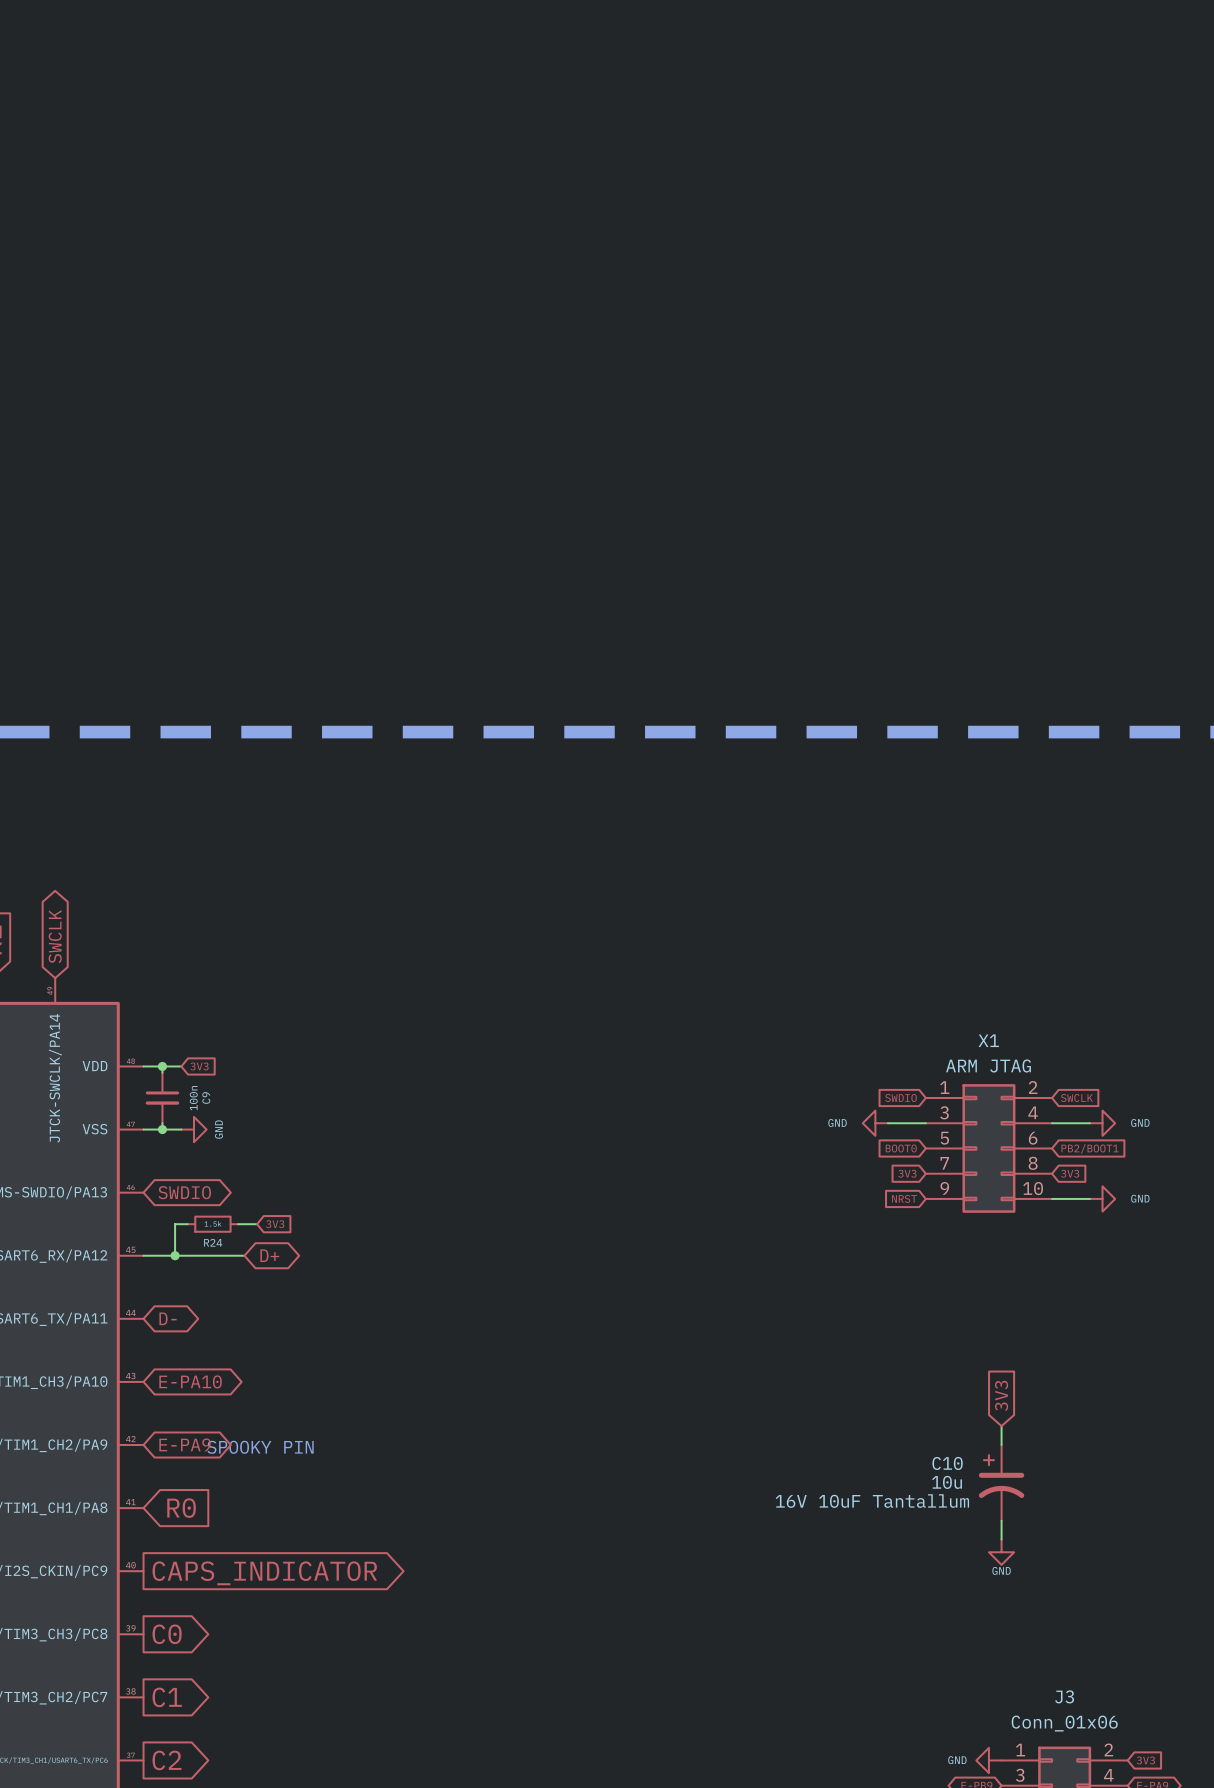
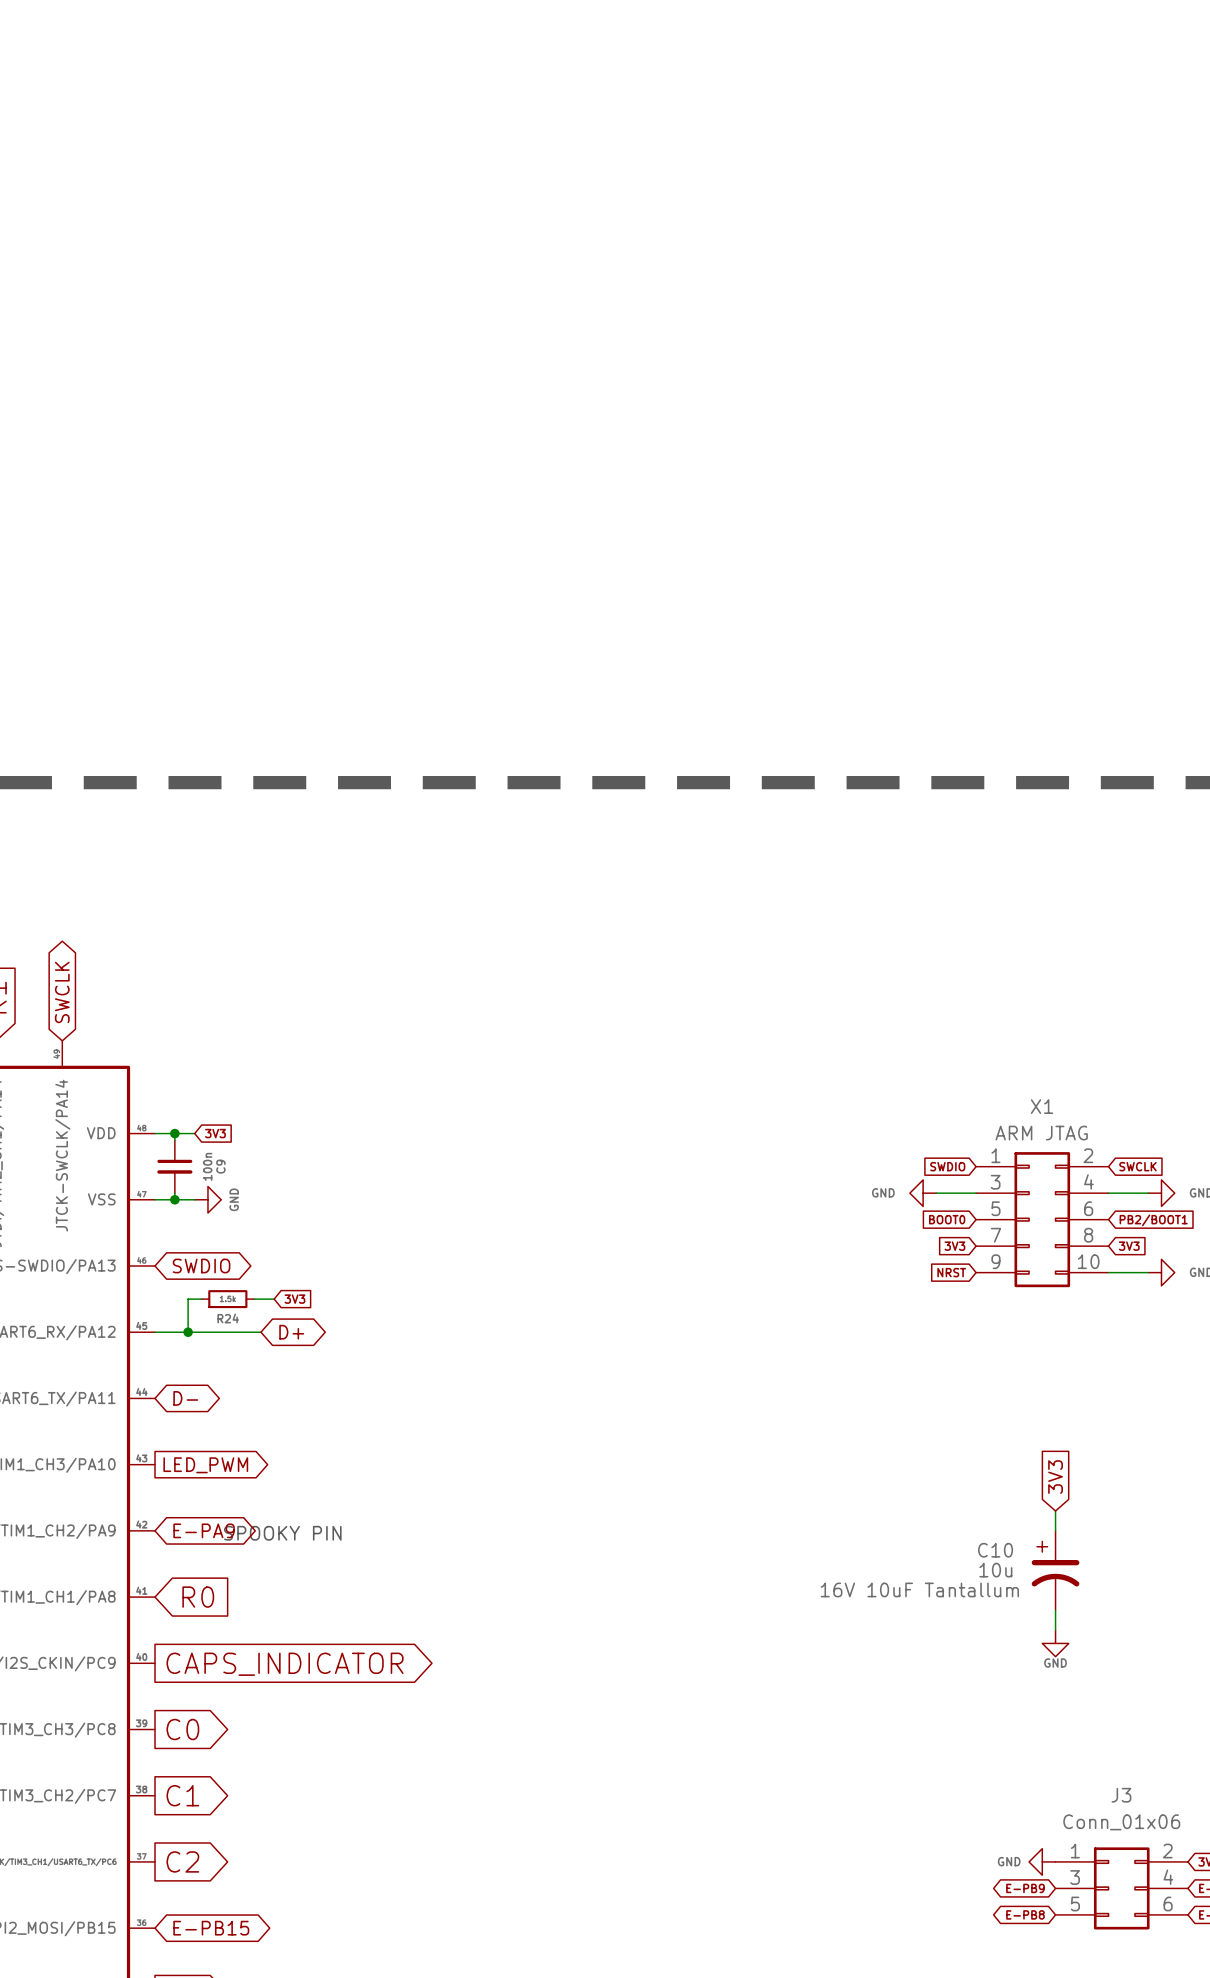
global label shape: bidirectional (190, 1381) -> output (205, 1465)
global label: E-PA10 (190, 1381) -> LED_PWM (205, 1465)

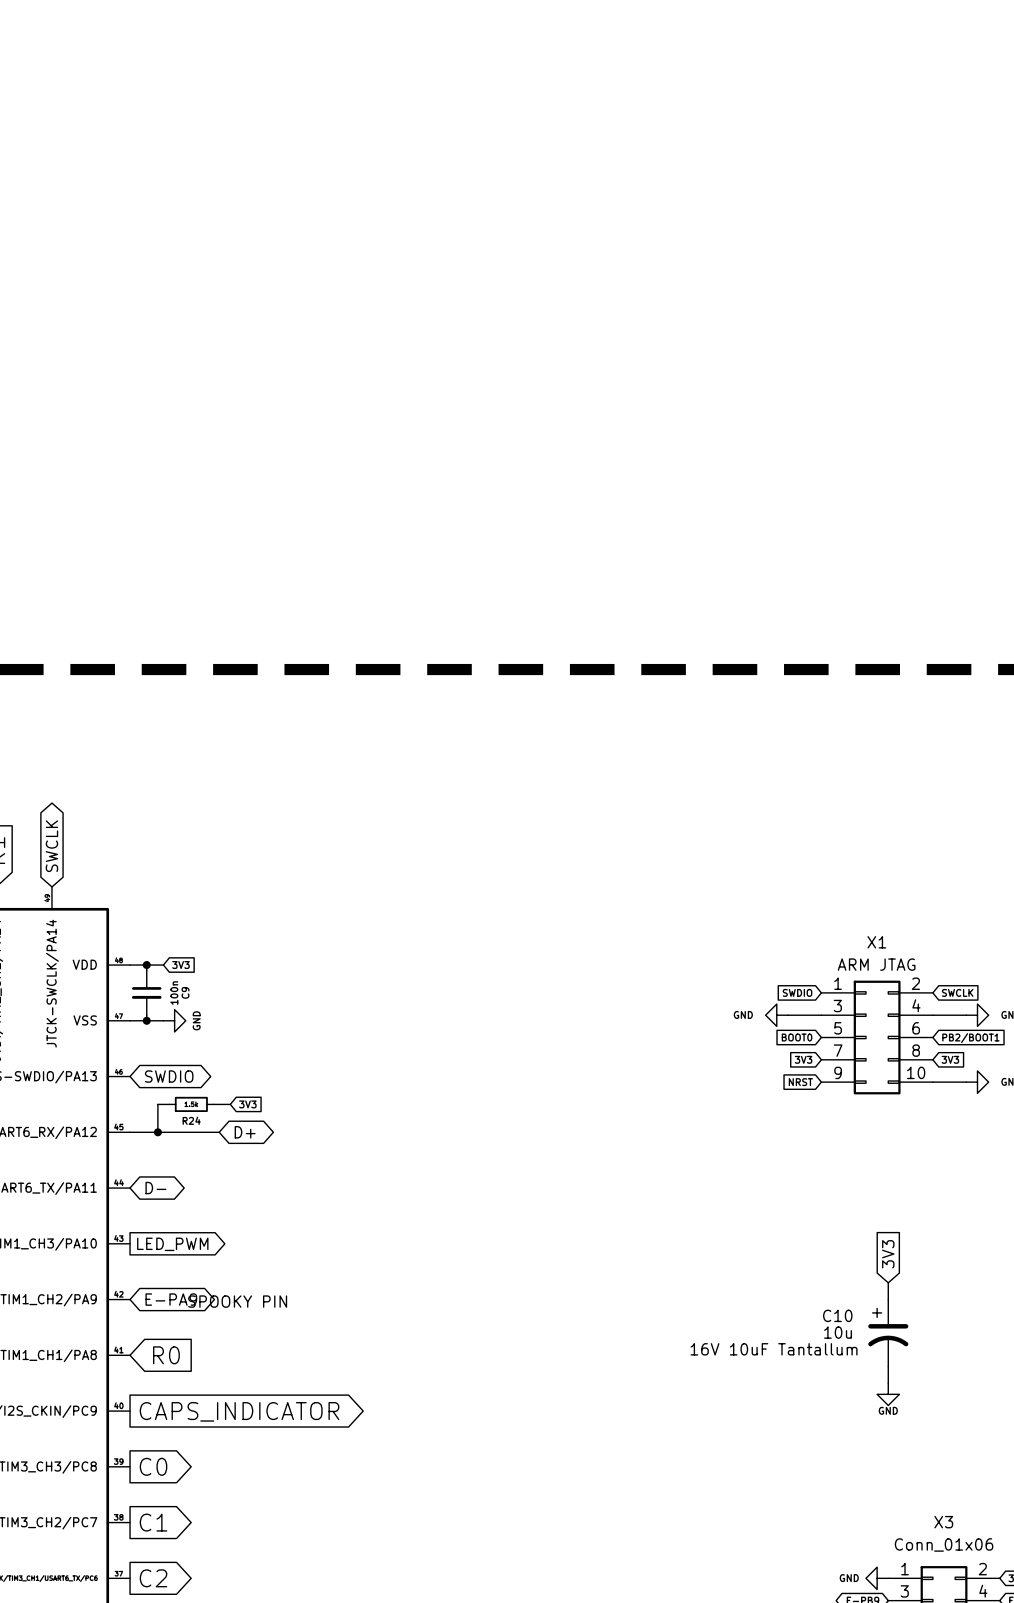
J3 name: J3 (1121, 1795) -> X3 (943, 1522)

